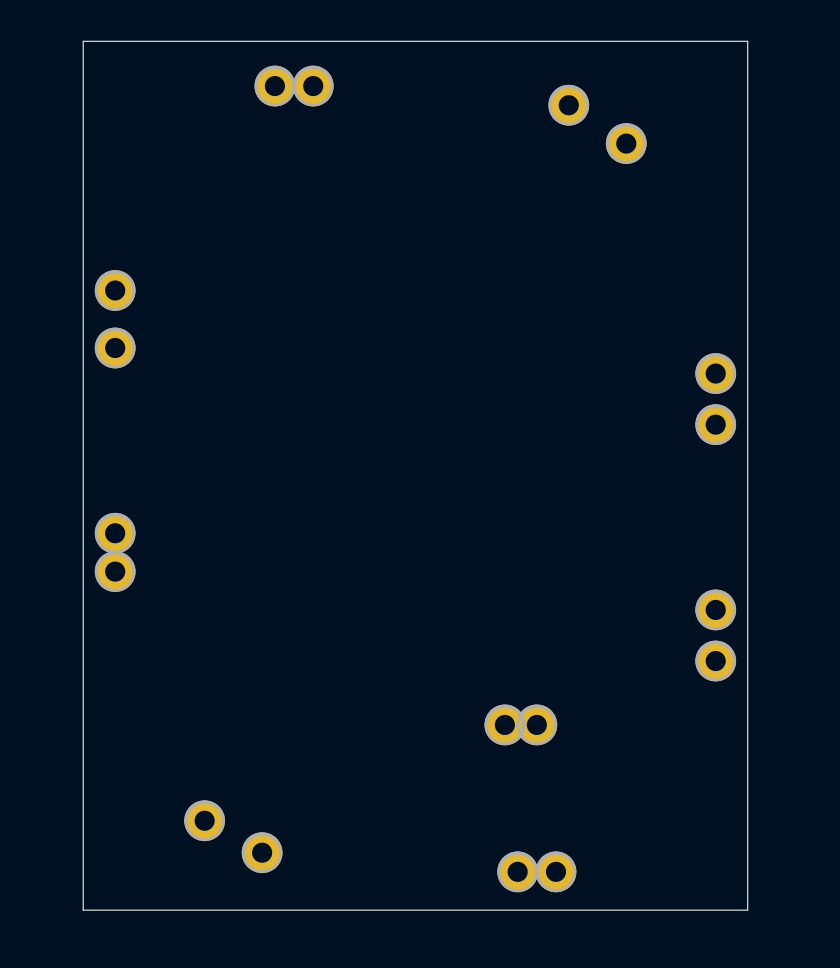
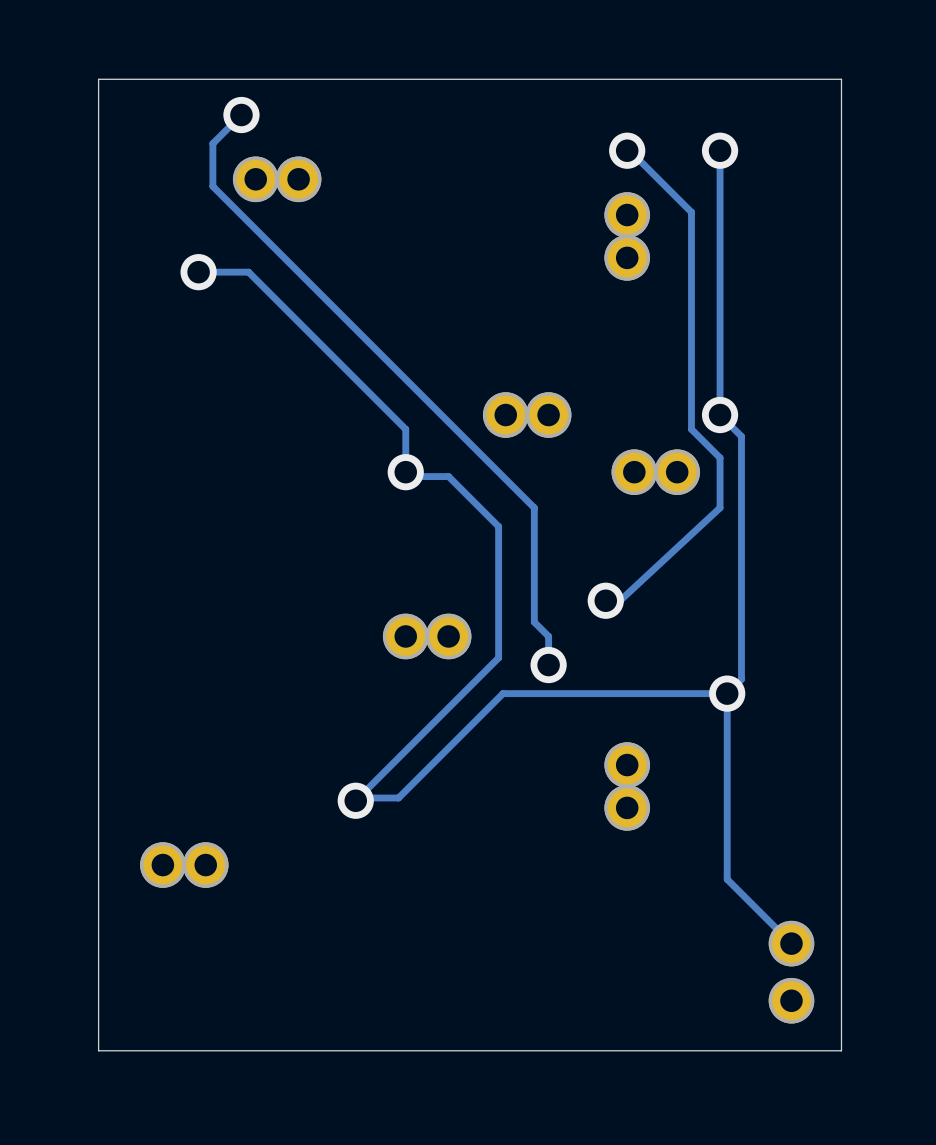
track: none -> (241, 115) (212, 143) (212, 186) (534, 507) (534, 622) (548, 636) (548, 665)
via: none -> (241, 115)
part: (274, 86) -> none
part: (313, 86) -> none
track: none -> (627, 150) (629, 150) (691, 212) (691, 429) (720, 457) (720, 507) (620, 600) (605, 600)
via: none -> (627, 150)
part: (568, 105) -> none
track: none -> (720, 150) (720, 415) (741, 436) (741, 679) (727, 693)
via: none -> (720, 150)
part: none -> (255, 179)
part: none -> (298, 179)
part: (626, 143) -> none
part: none -> (627, 215)
part: none -> (627, 257)
track: none -> (198, 272) (248, 272) (405, 429) (405, 472) (410, 476) (448, 476) (498, 526) (498, 657) (355, 800)
via: none -> (198, 272)
part: (115, 290) -> none
part: none -> (505, 415)
part: none -> (548, 415)
via: none -> (720, 415)
part: (115, 347) -> none
part: (715, 373) -> none
via: none -> (405, 472)
part: none -> (634, 472)
part: none -> (677, 472)
part: (715, 424) -> none
via: none -> (605, 600)
part: (115, 533) -> none
part: none -> (405, 636)
part: none -> (448, 636)
via: none -> (548, 665)
part: (115, 571) -> none
track: none -> (727, 693) (727, 879) (791, 943)
track: none -> (727, 693) (503, 693) (398, 798) (358, 798)
via: none -> (727, 693)
part: (715, 609) -> none
part: none -> (627, 765)
part: (715, 661) -> none
via: none -> (355, 800)
part: none -> (627, 807)
part: (504, 724) -> none
part: (536, 724) -> none
part: none -> (162, 865)
part: none -> (205, 865)
part: none -> (791, 943)
part: (204, 820) -> none
part: (262, 852) -> none
part: none -> (791, 1000)
part: (517, 871) -> none
part: (555, 871) -> none

